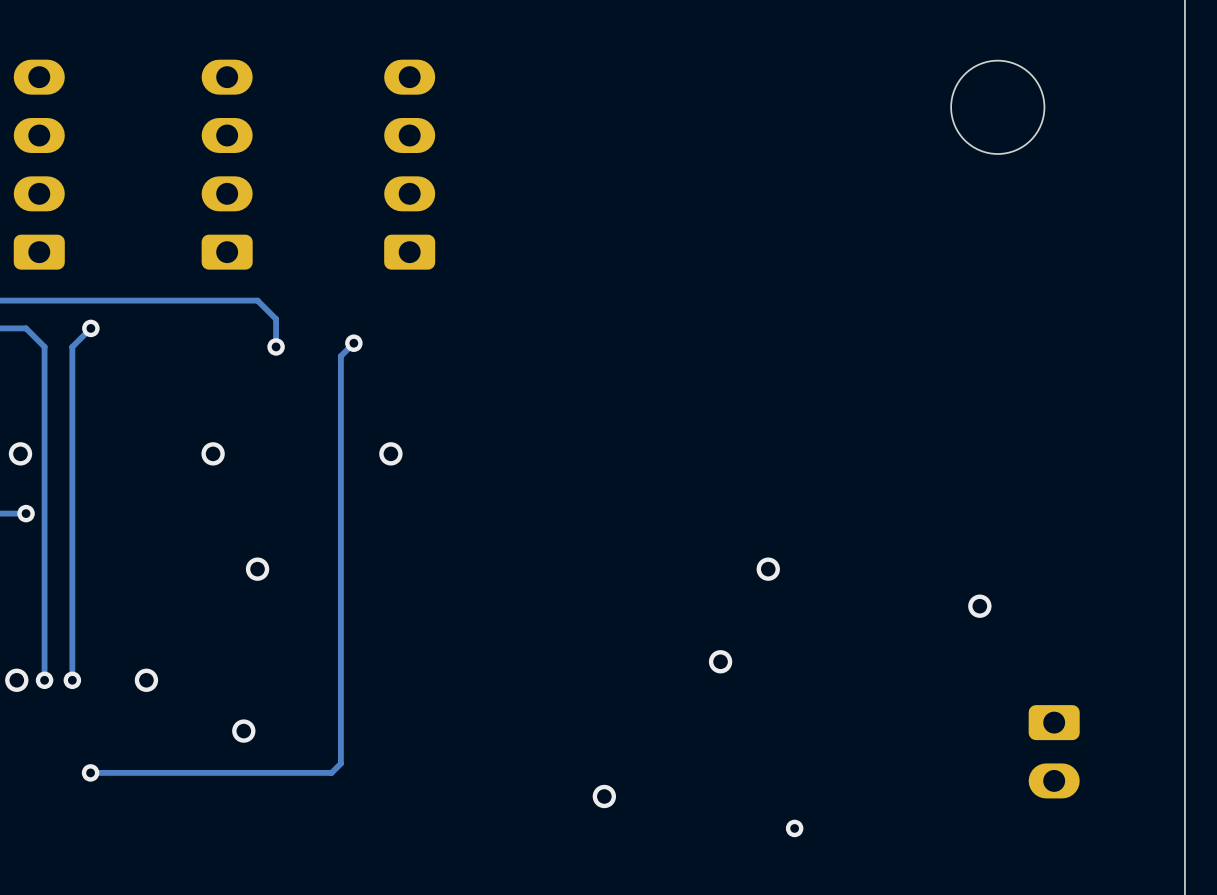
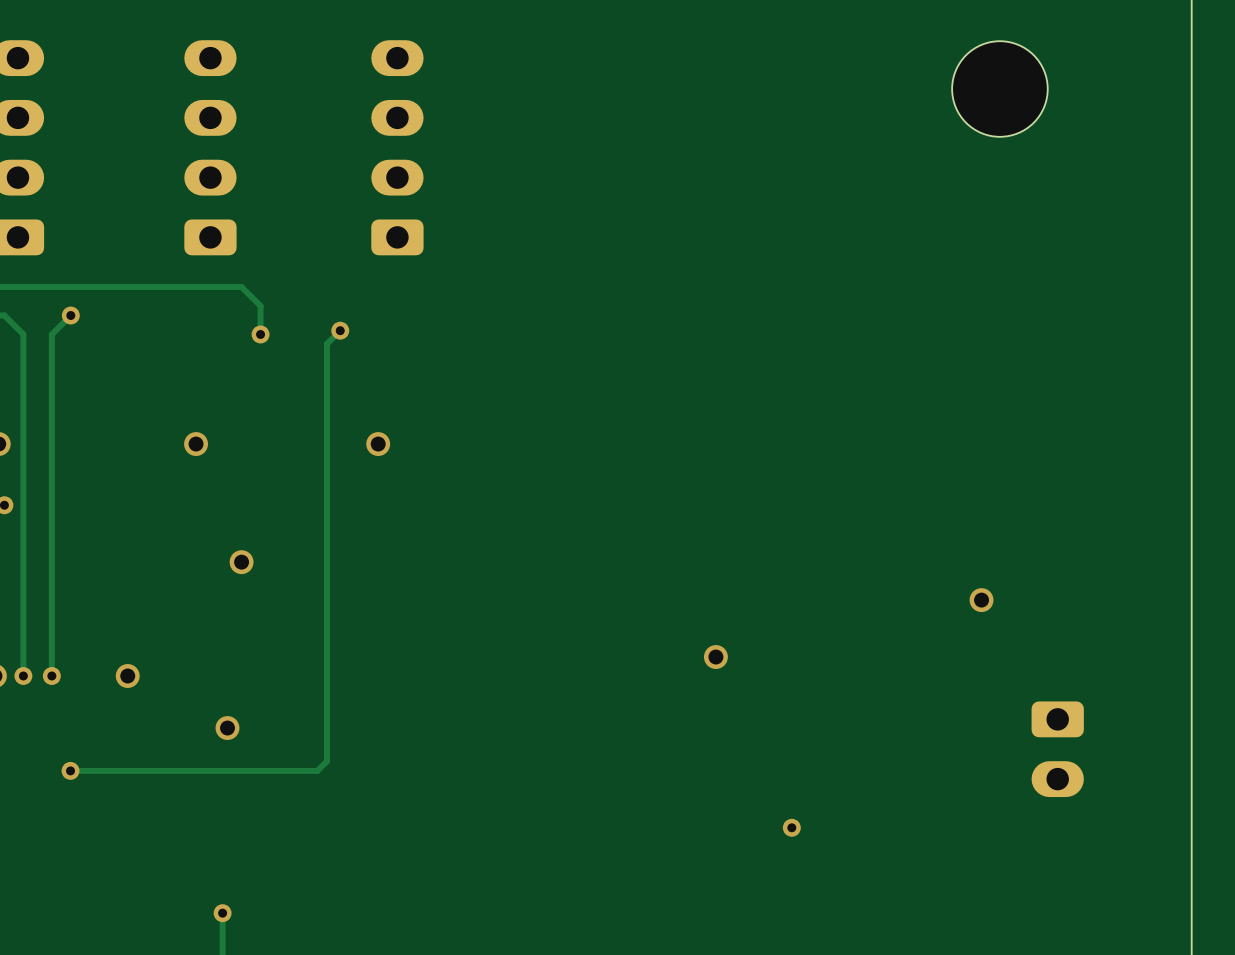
via: (768, 569) -> none
via: (604, 796) -> none

